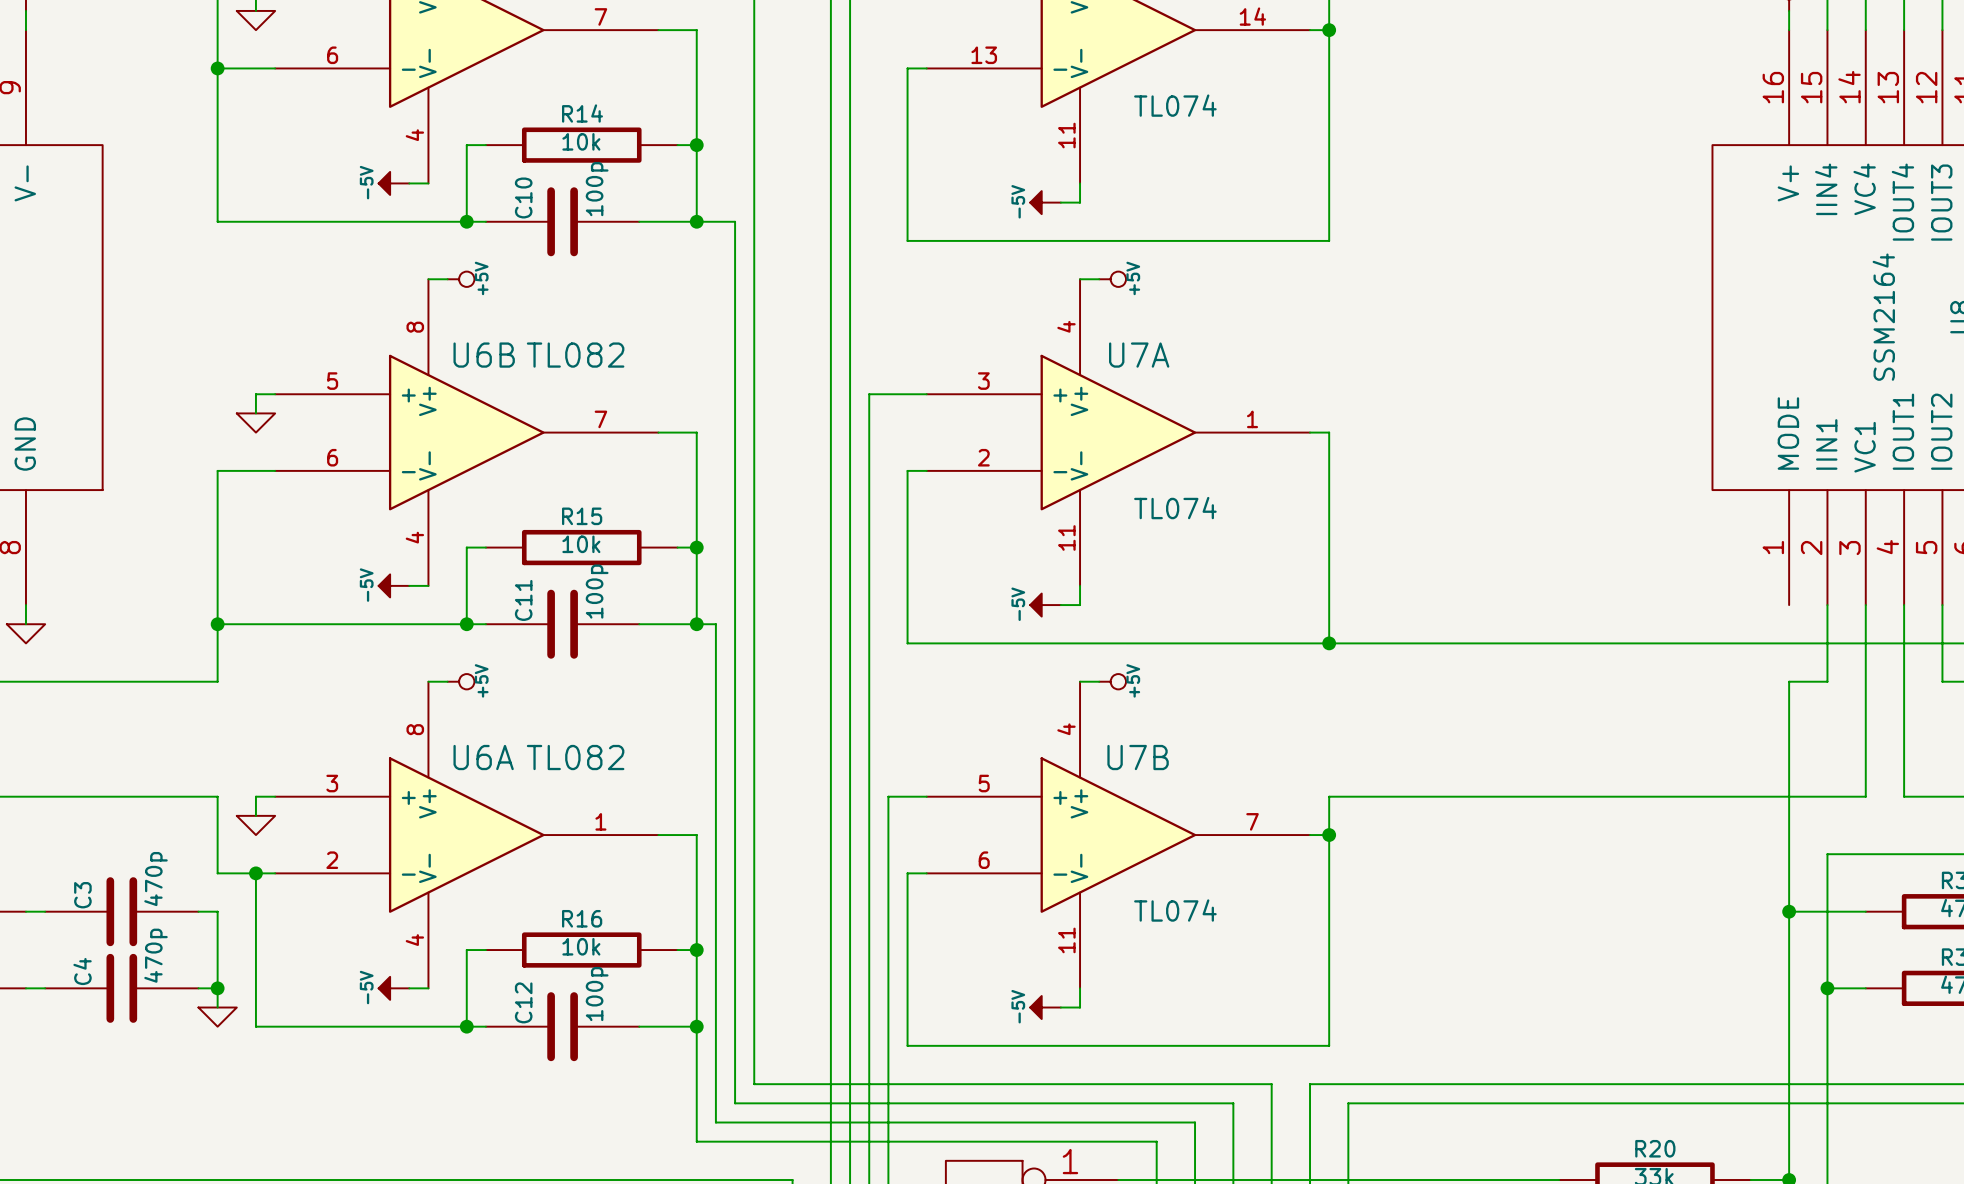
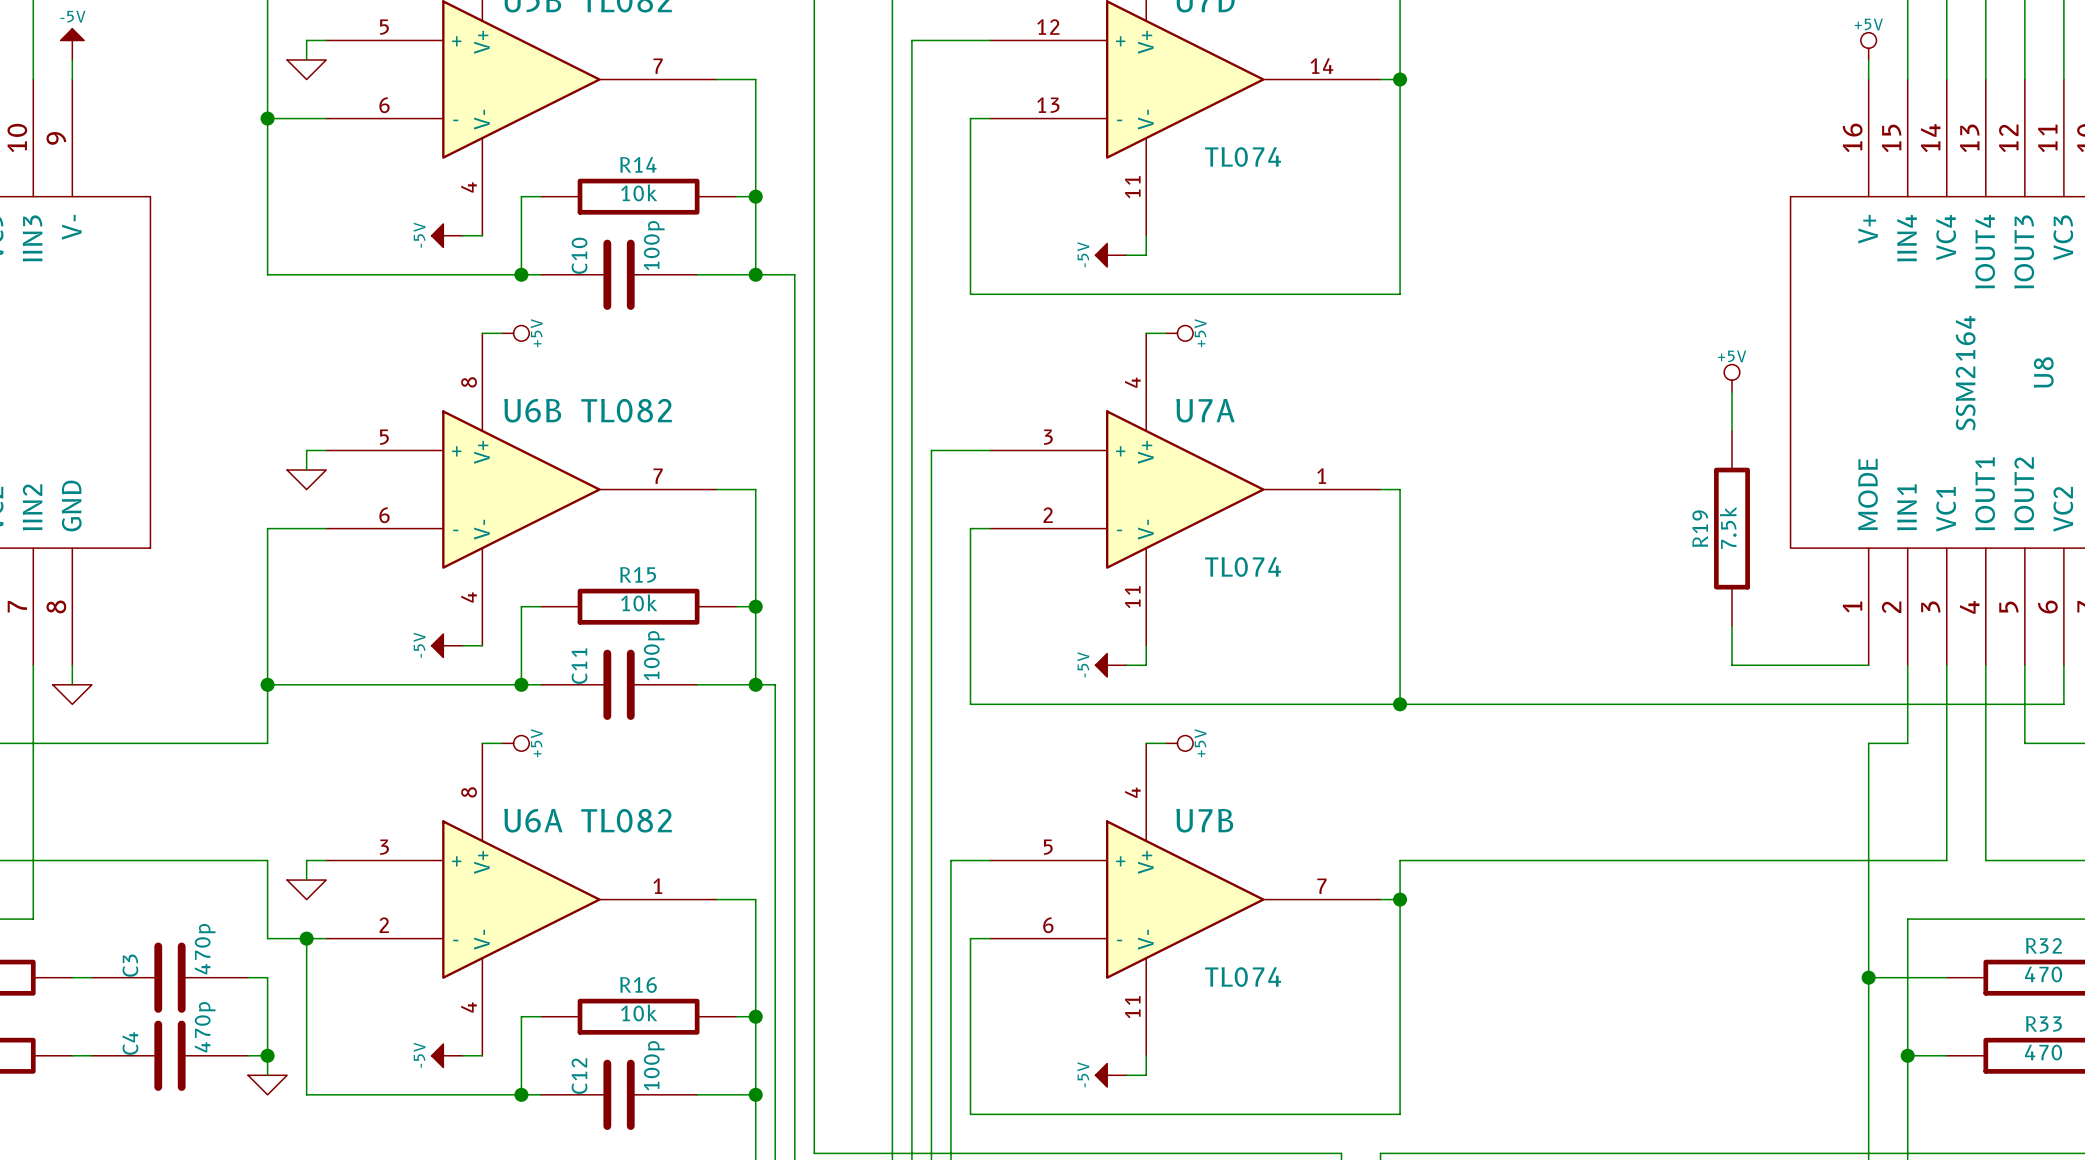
power symbol: none -> +5V (1731, 378)
wire: none -> (1731, 391) (1731, 430)
R19: none -> 7.5k (1731, 528)
wire: none -> (1731, 626) (1731, 665) (1868, 665)

